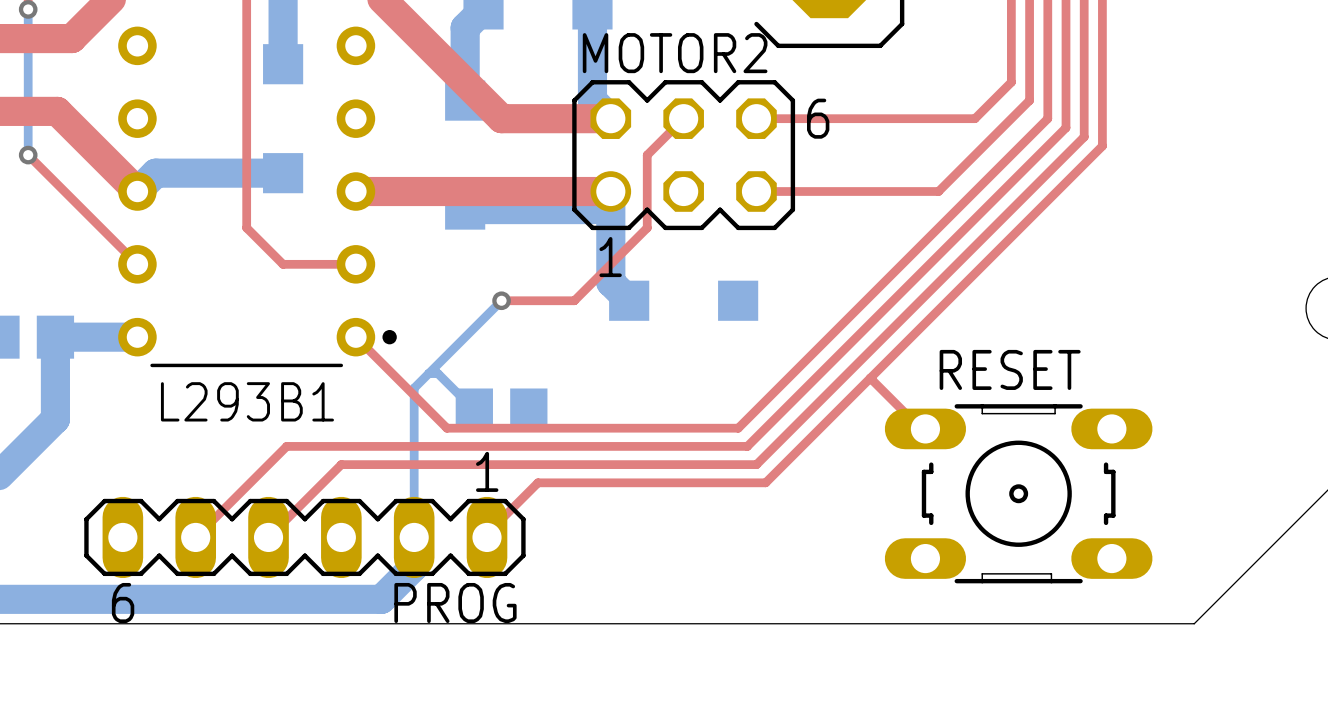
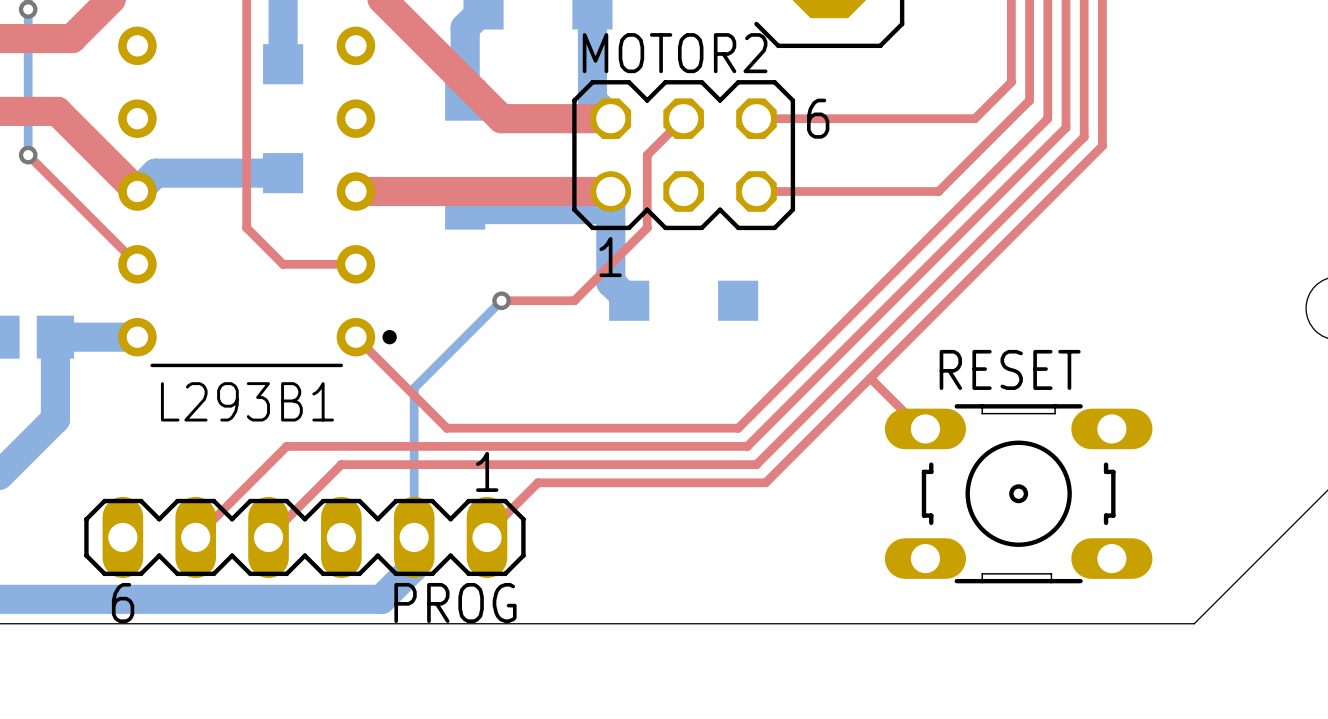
bottom track: (428, 373) (437, 373) (474, 409) -> none
part: (501, 409) -> none

